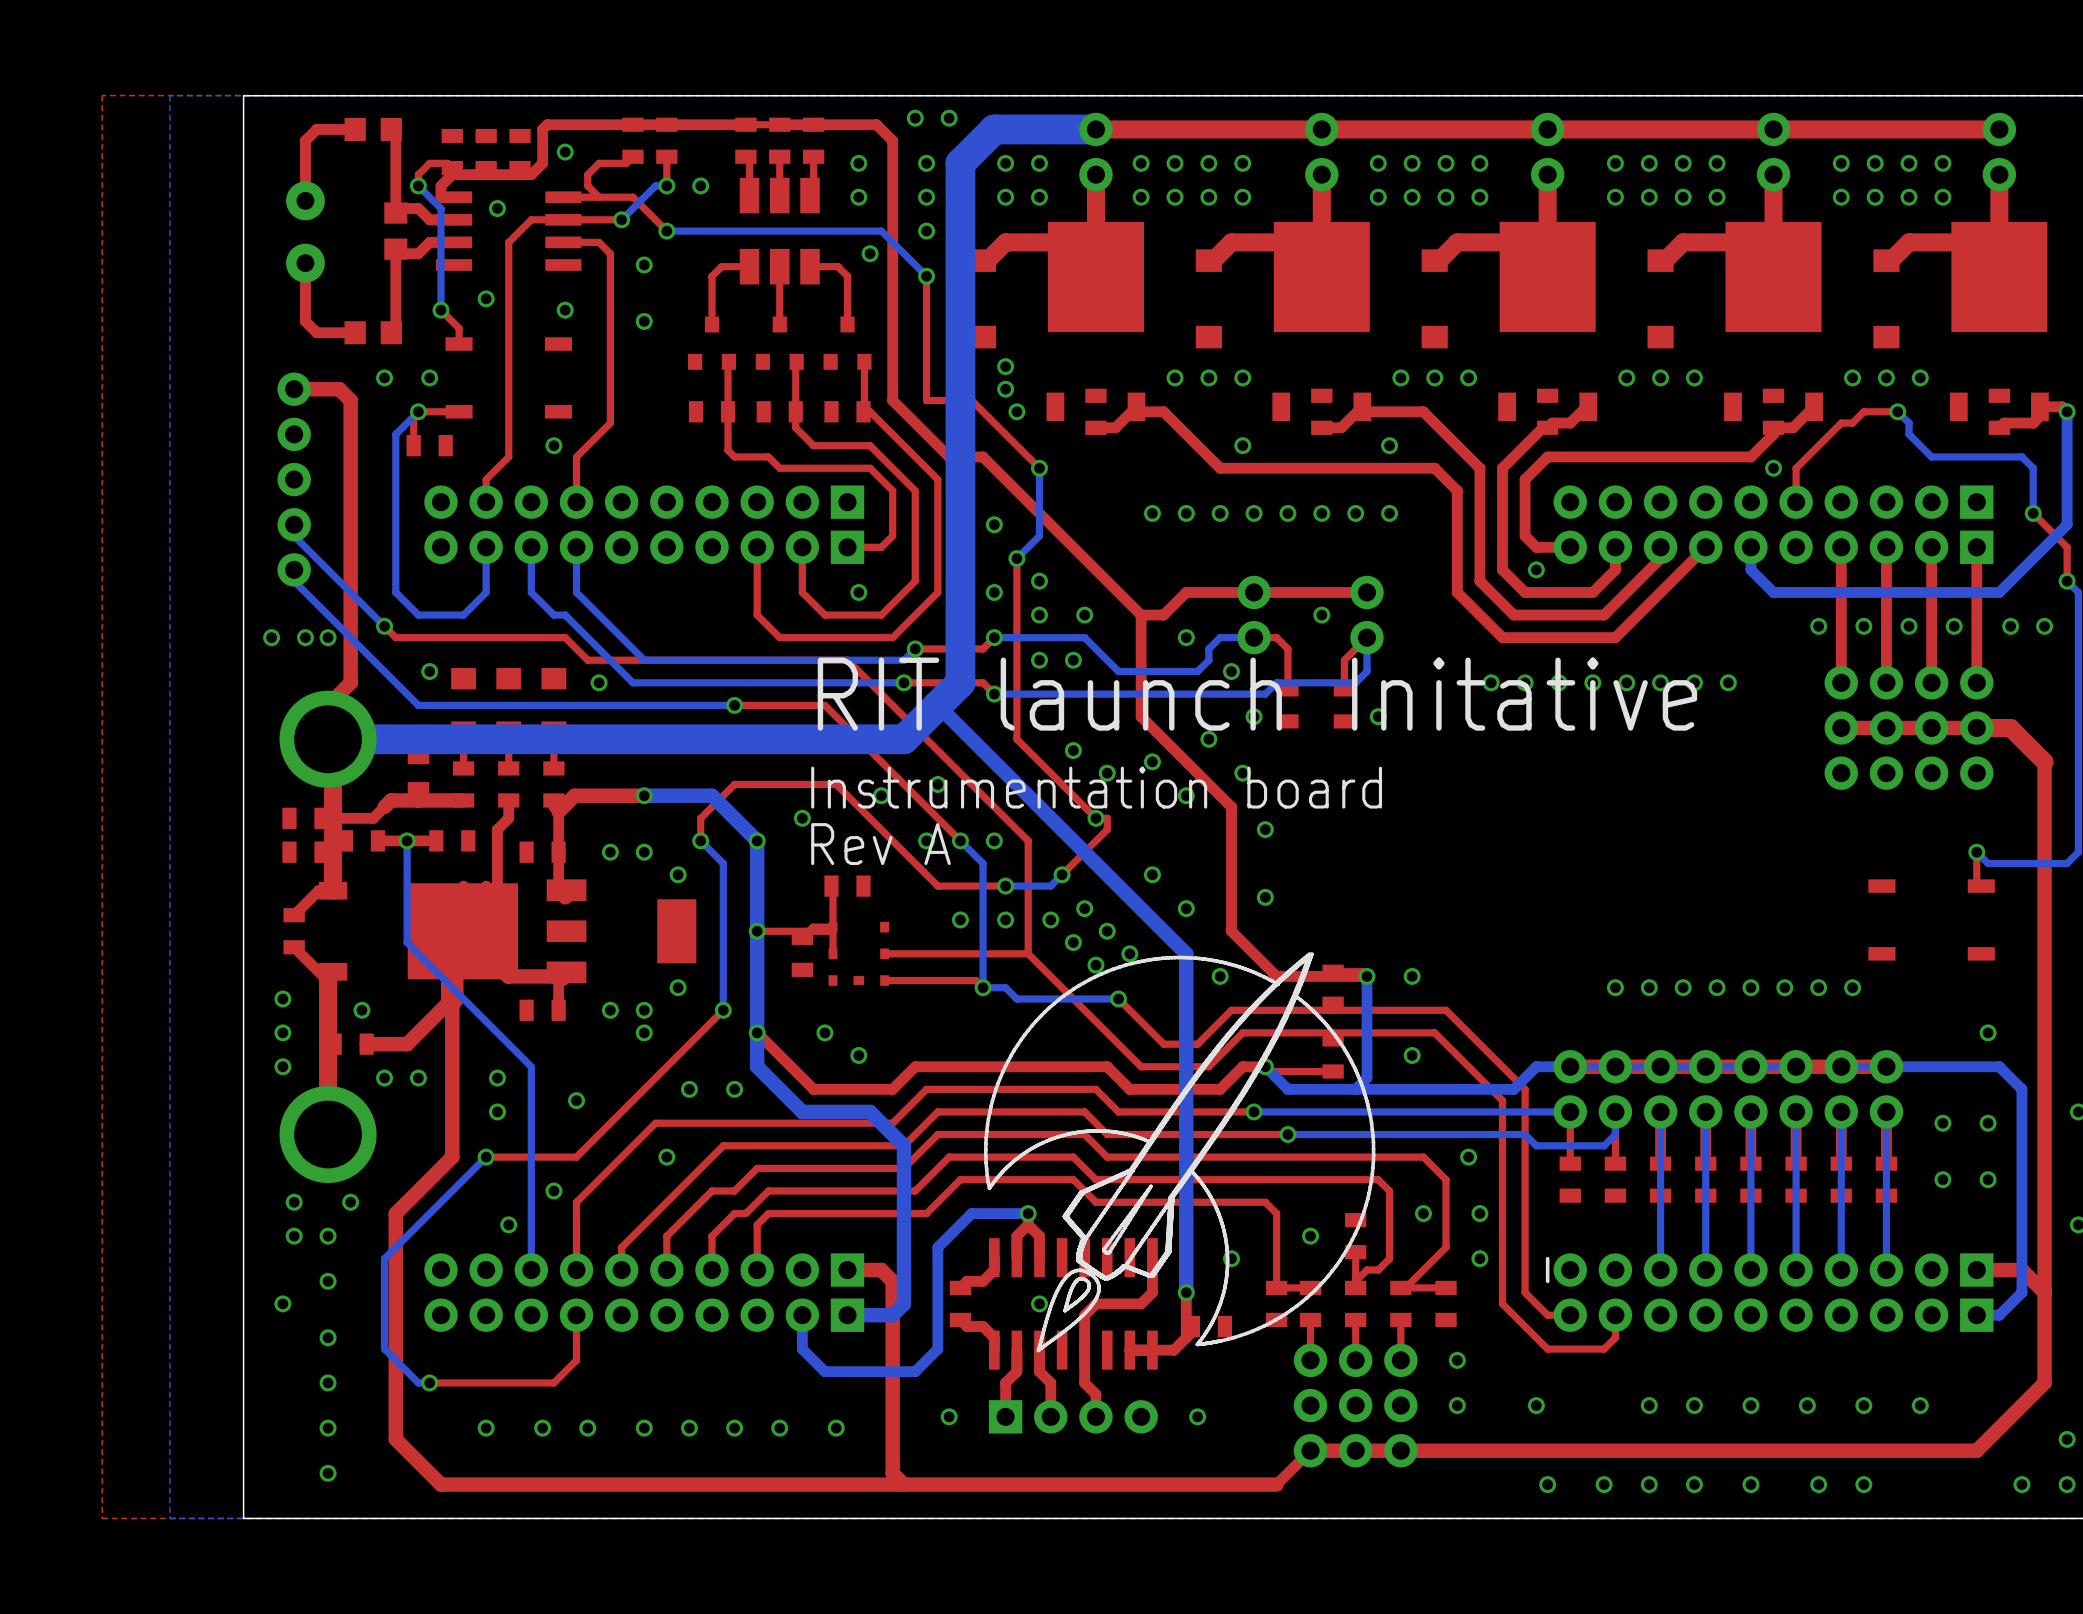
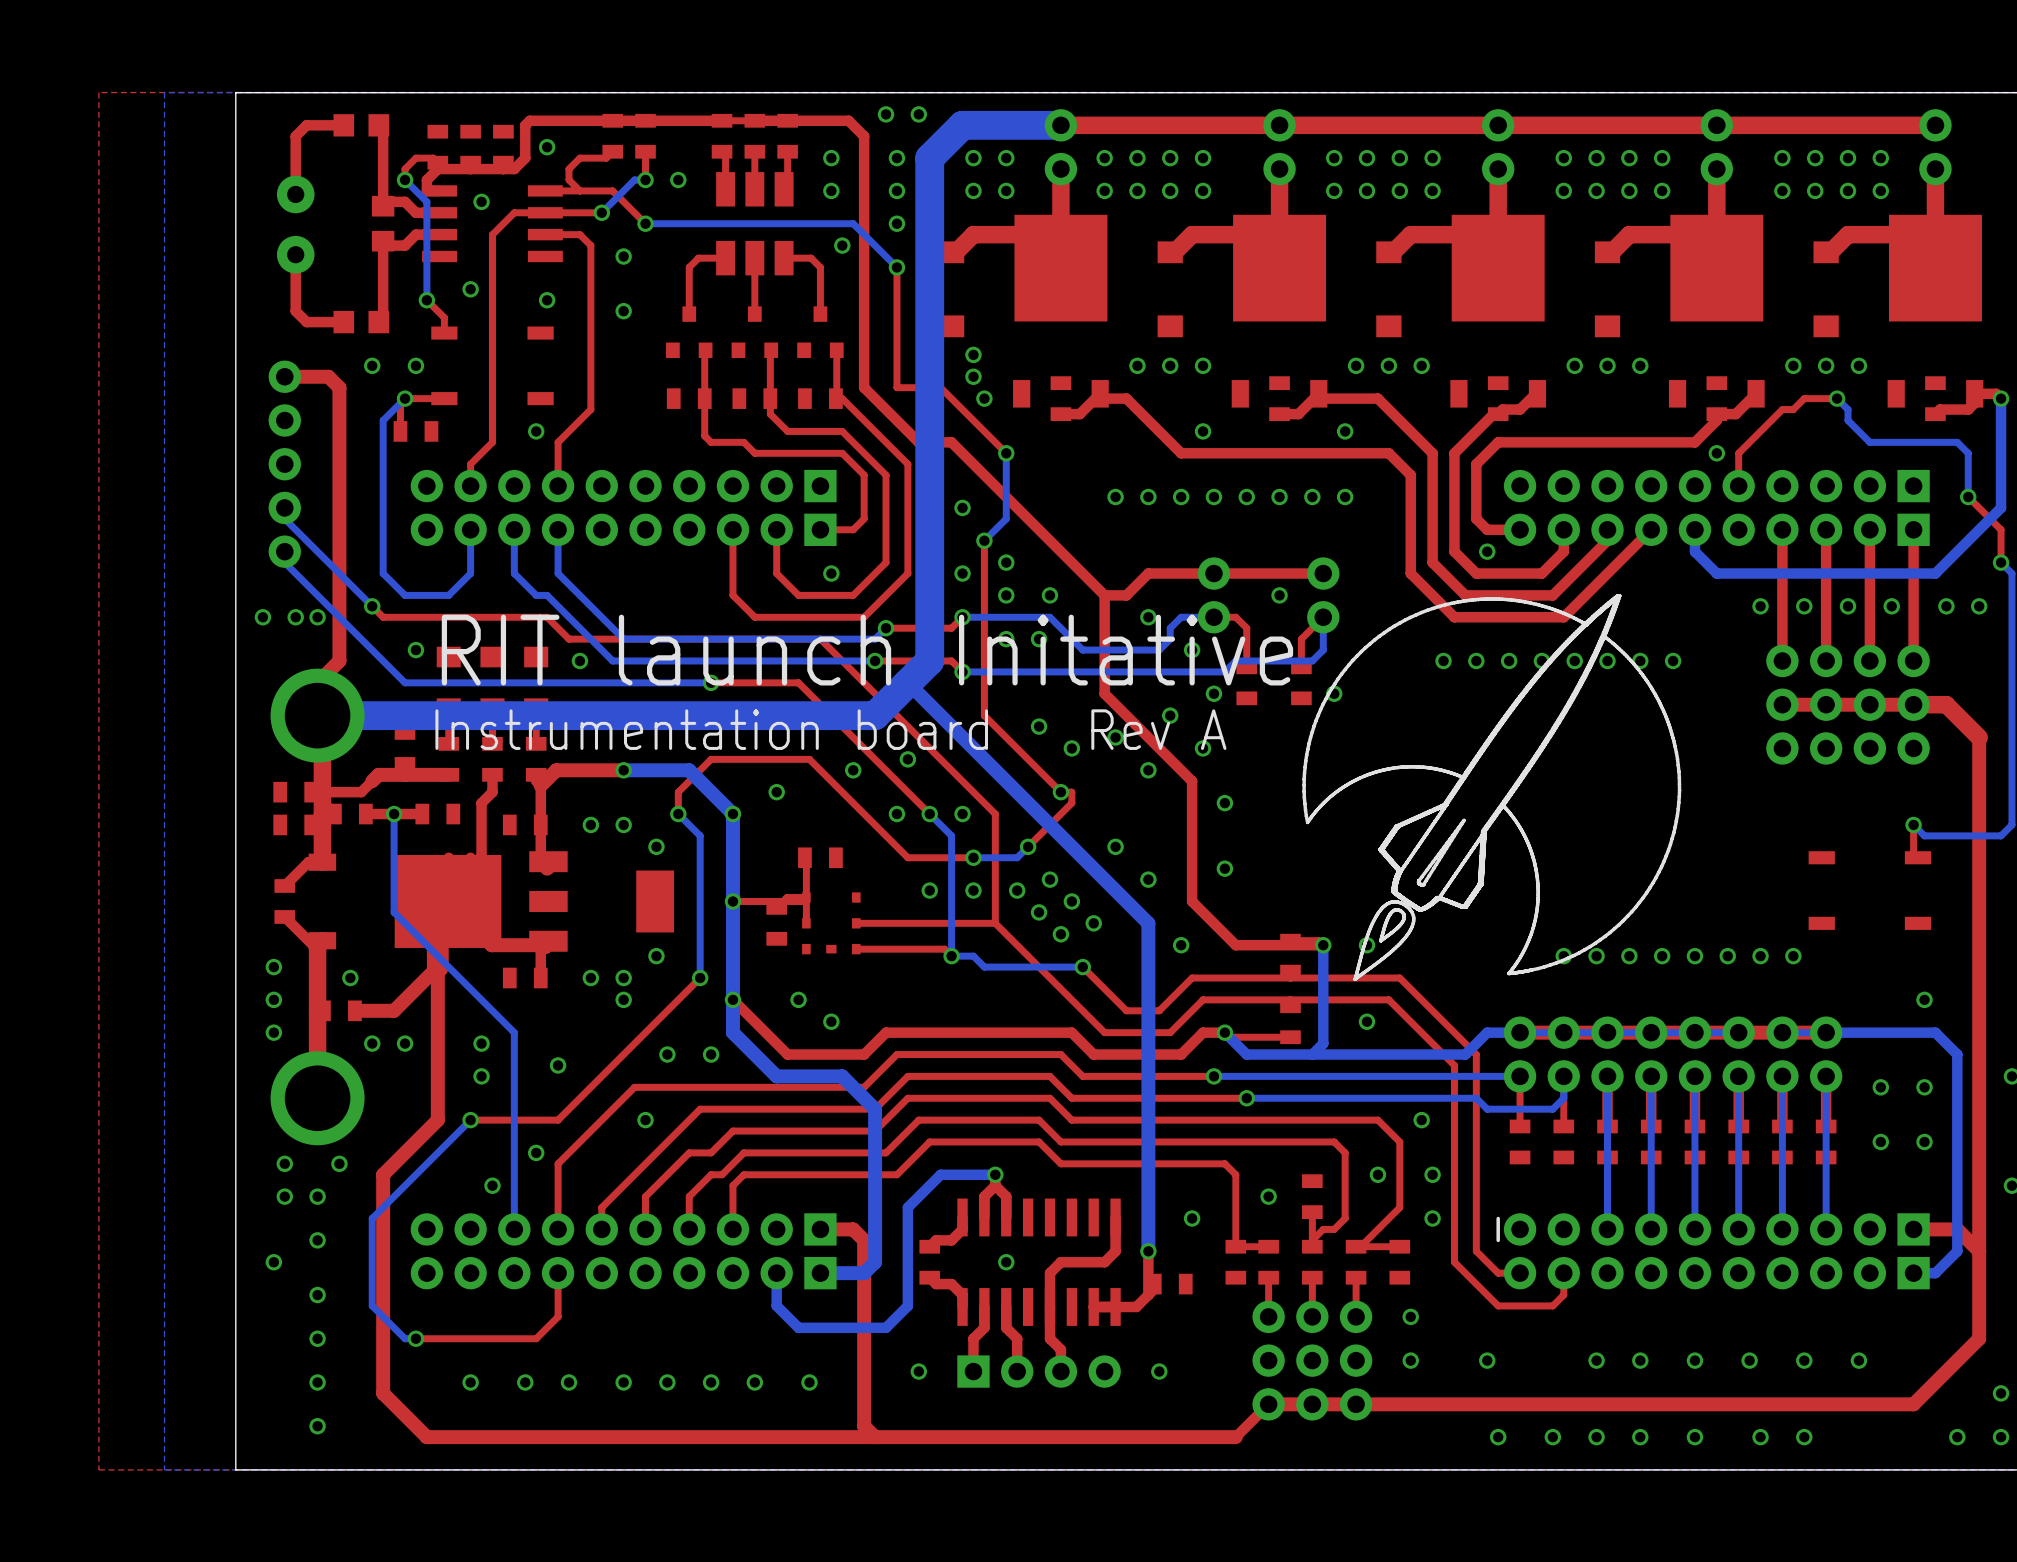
drawing: none -> [1302, 594, 1682, 982]
text position: RIT launch Initative (1257, 694) -> RIT launch Initative (867, 650)
text position: Instrumentation board (1096, 787) -> Instrumentation board (711, 729)
text position: Rev A (880, 844) -> Rev A (1158, 729)
drawing: [984, 952, 1376, 1353] -> none

